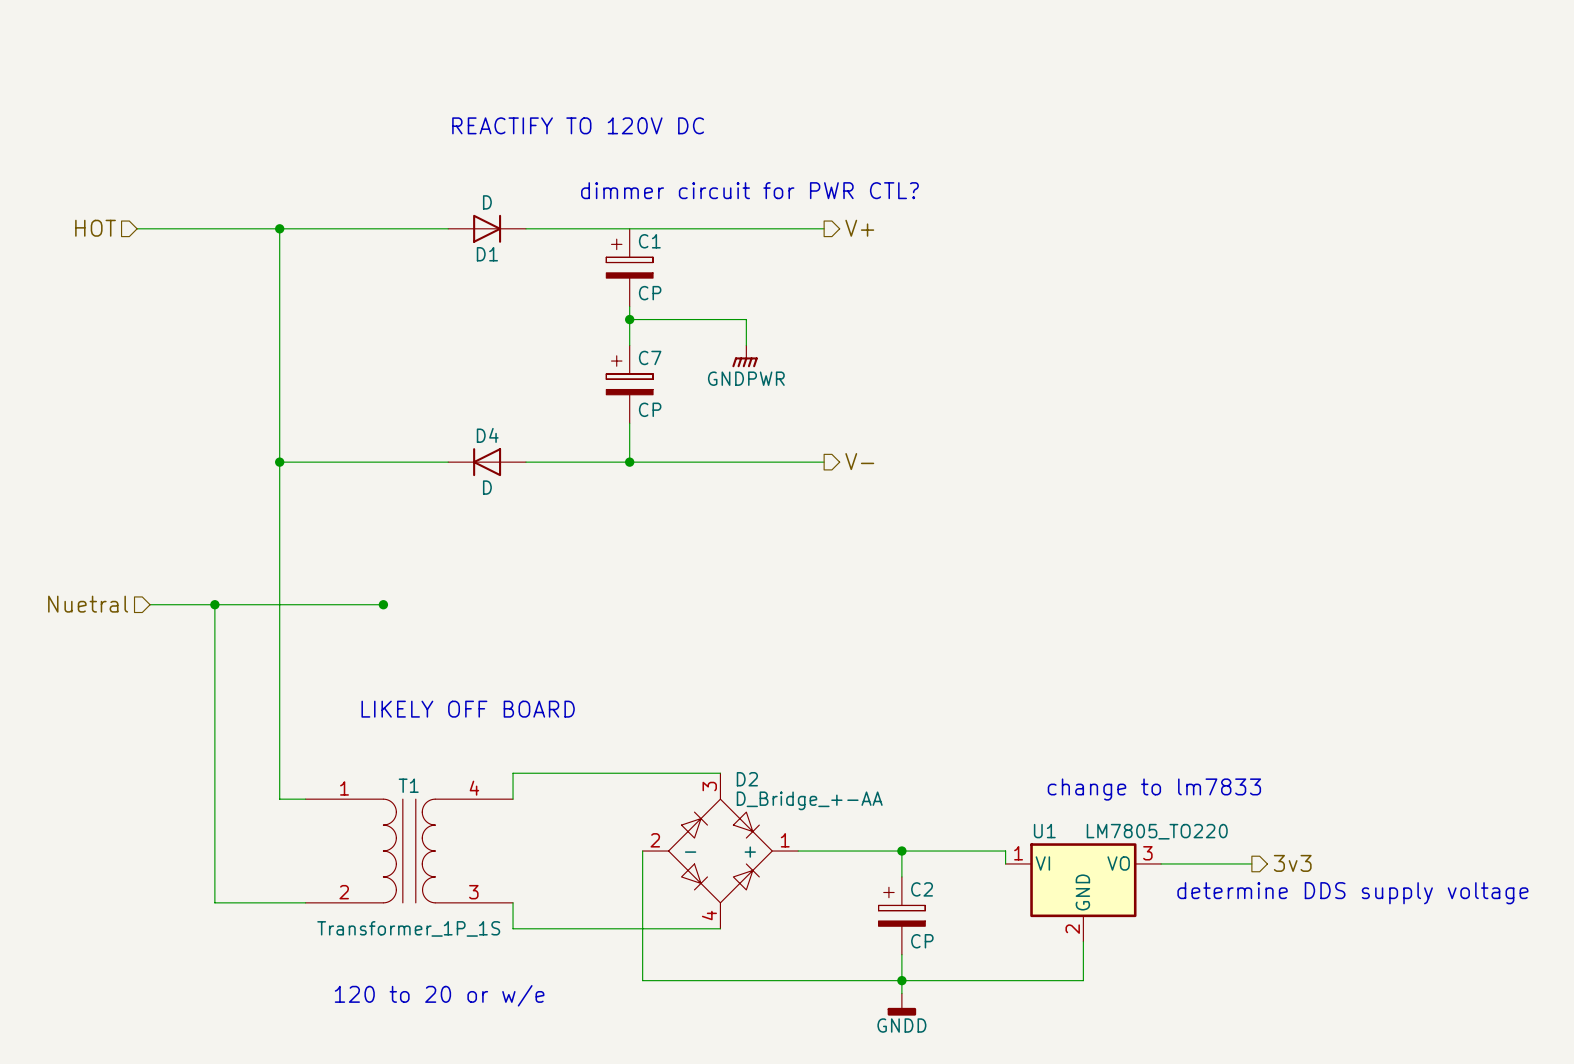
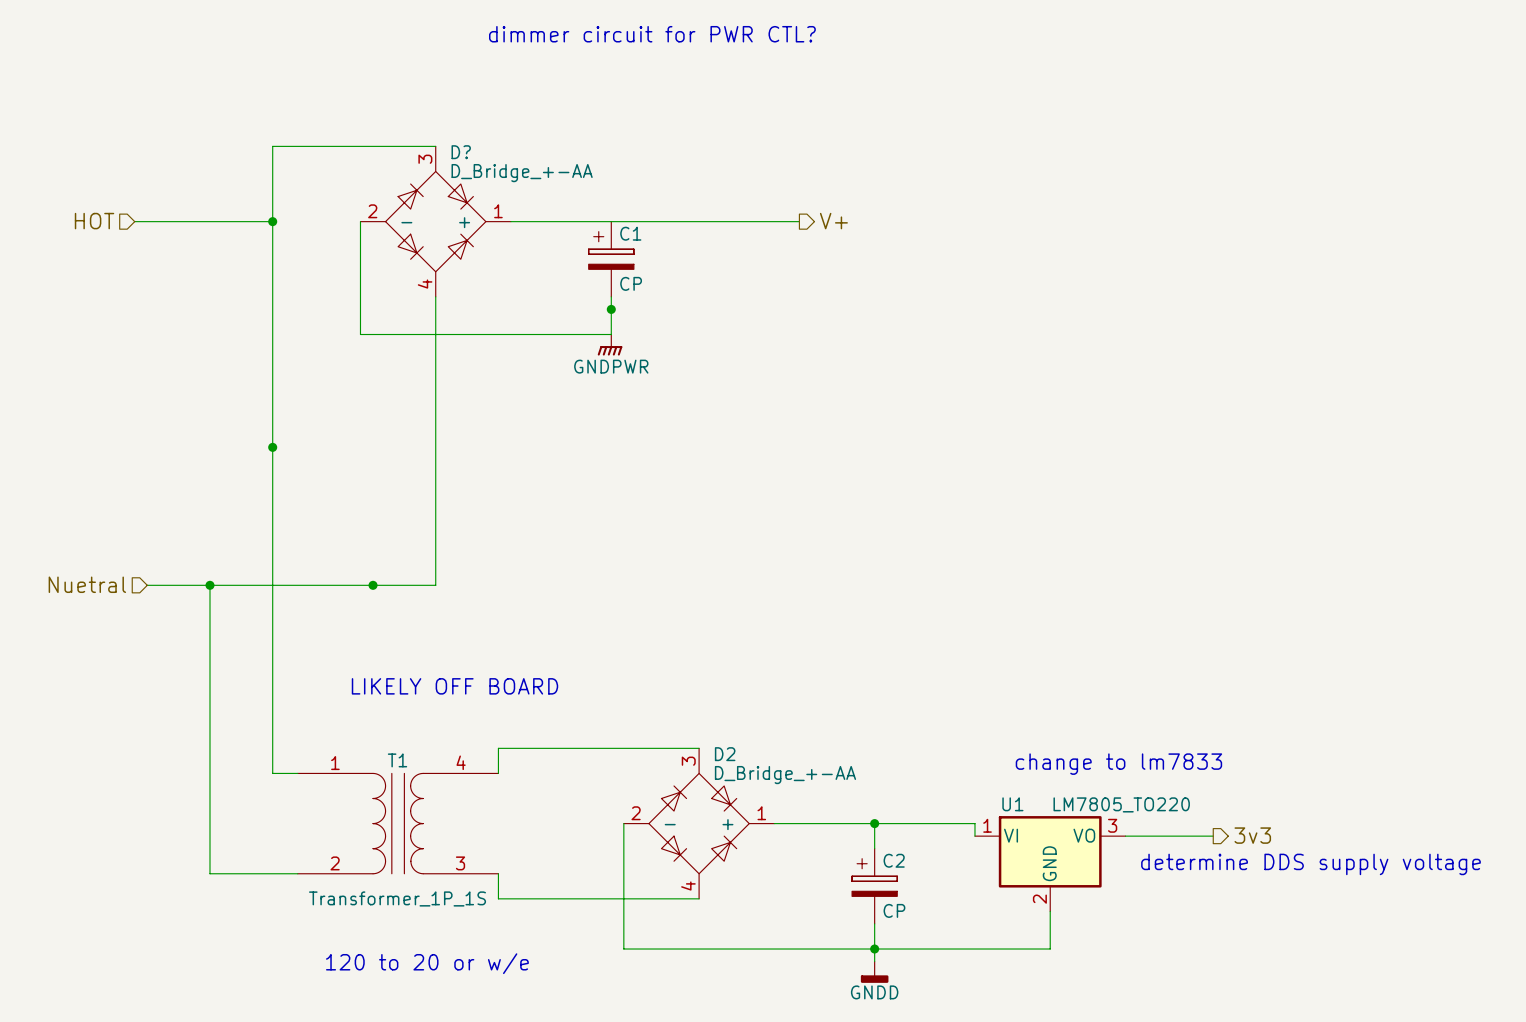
text: REACTIFY TO 120V DC (578, 125) -> none
text position: dimmer circuit for PWR CTL? (749, 190) -> dimmer circuit for PWR CTL? (652, 34)
wire: (279, 228) (448, 228) -> (272, 221) (272, 146) (435, 146)
wire: none -> (360, 221) (360, 334) (611, 334)
D?: none -> D_Bridge_+-AA (435, 221)
D1: D (487, 228) -> none
wire: none -> (435, 296) (435, 585) (373, 585)
wire: (629, 319) (746, 319) (746, 345) -> none
power symbol position: GNDPWR (745, 356) -> GNDPWR (610, 345)
C7: CP (629, 384) -> none
wire: (629, 423) (629, 462) -> none
hierarchical label: V- (859, 461) -> none
wire: (279, 462) (448, 462) -> none
D4: D (487, 462) -> none
wire: (525, 462) (824, 462) -> none
junction: (629, 462) -> none

